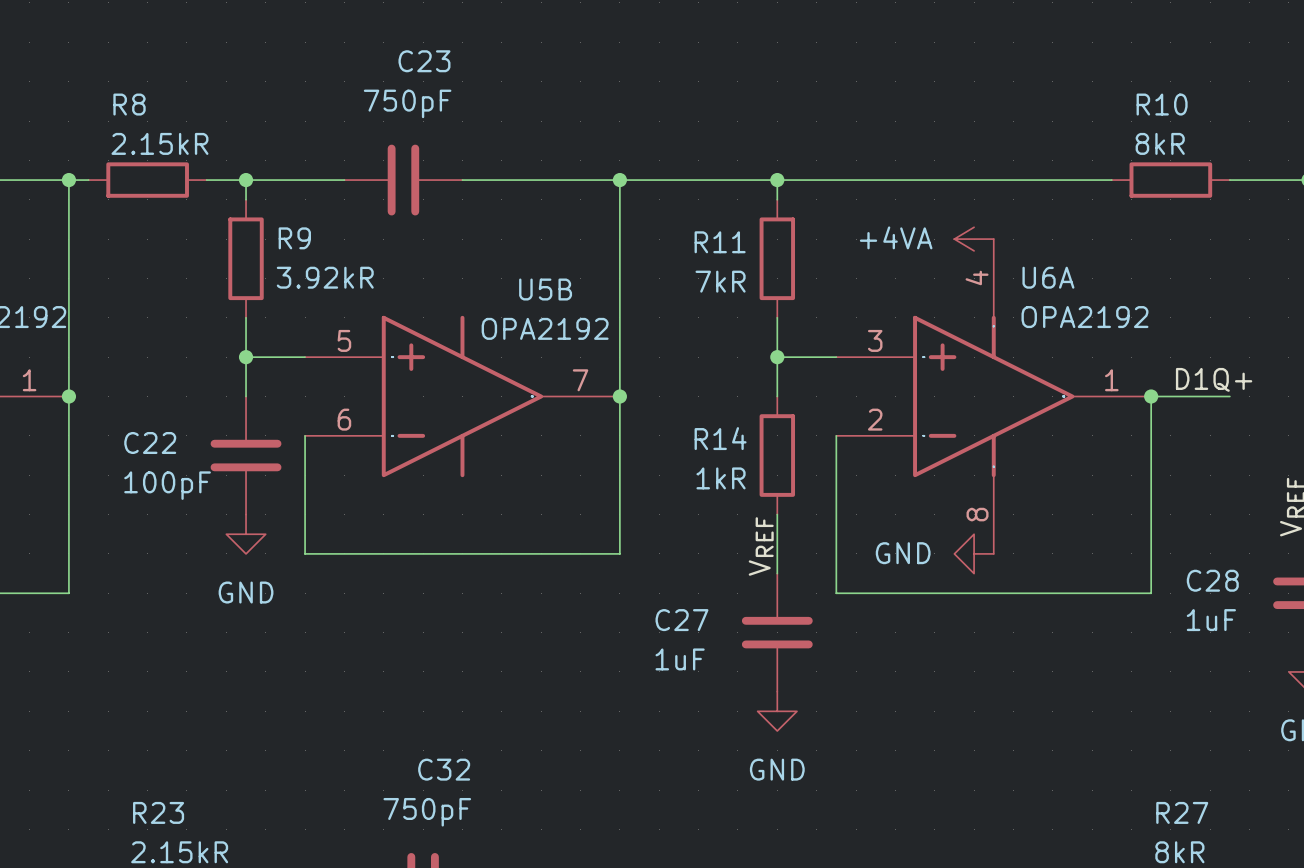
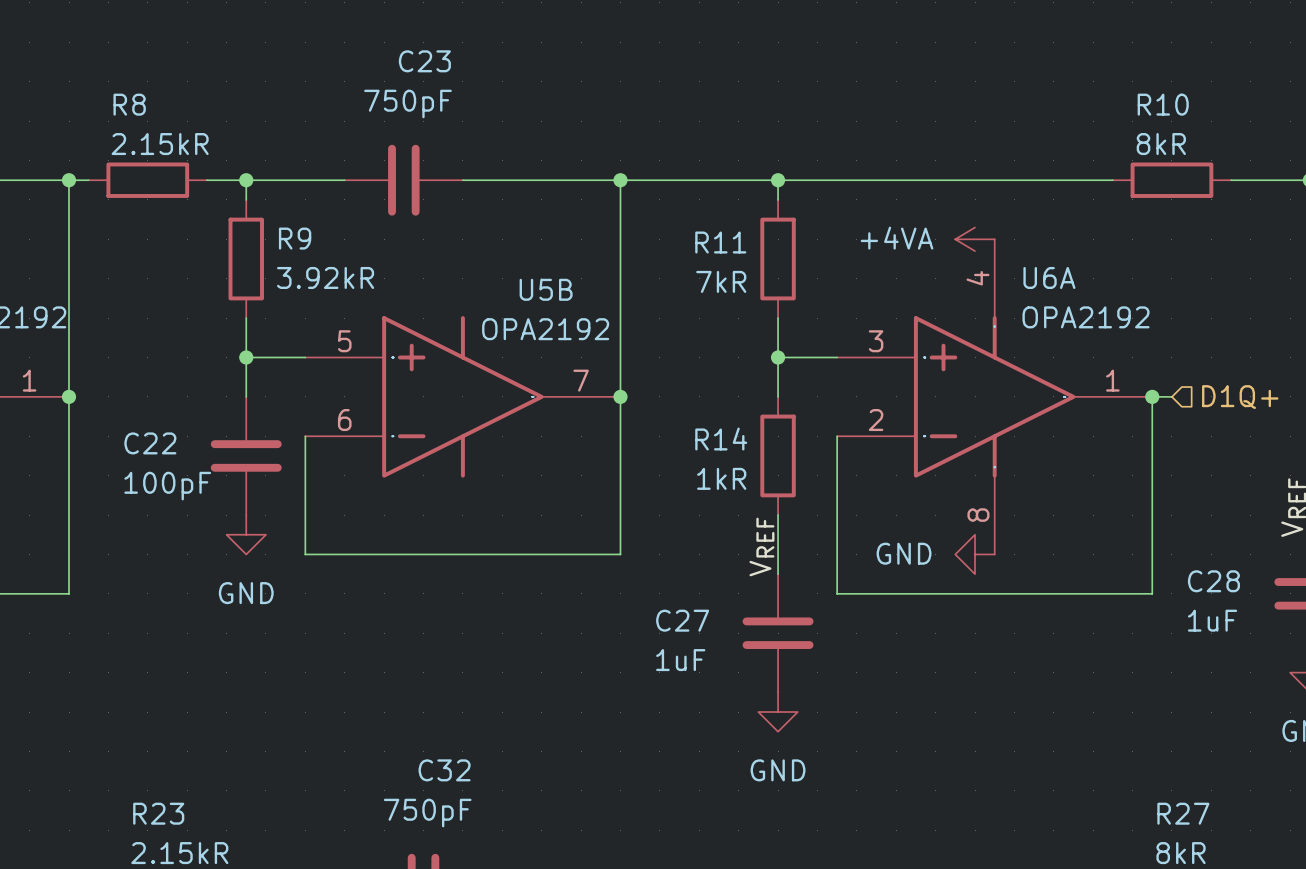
label: D1Q+ (1214, 379) -> none
wire: (1170, 396) (1229, 396) -> none
hierarchical label: none -> D1Q+ (1240, 397)

